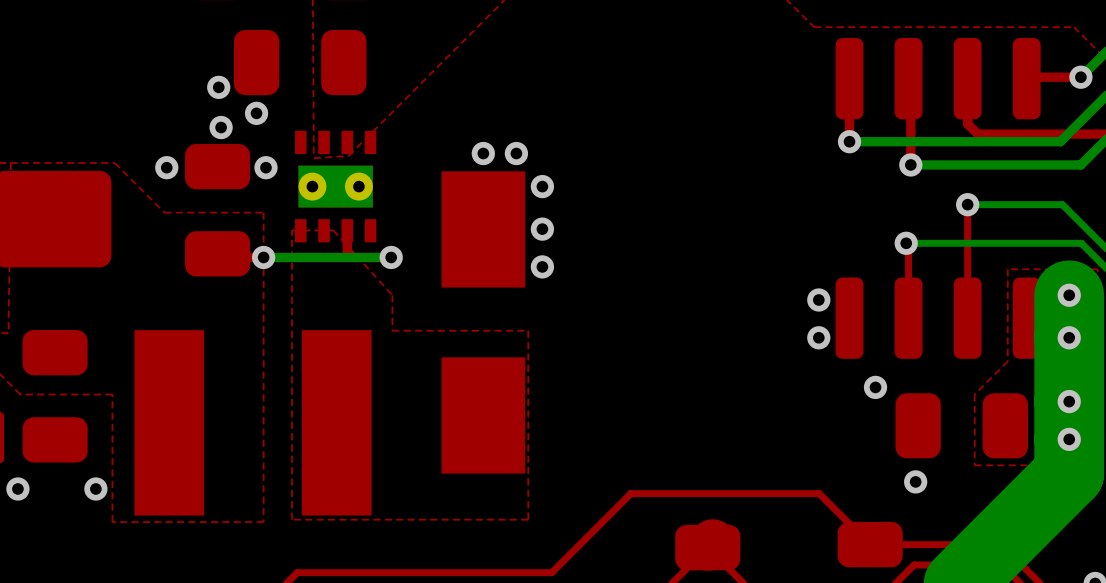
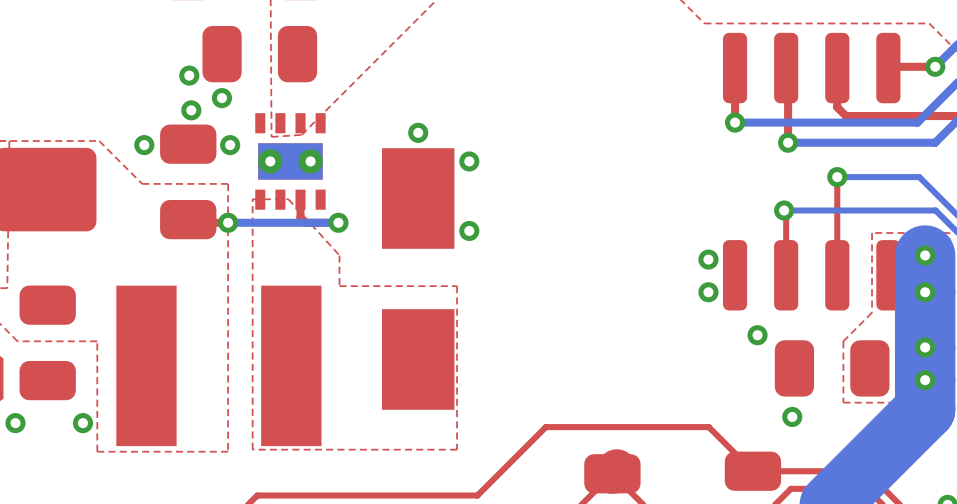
via: (516, 153) -> none
via: (542, 229) -> none

